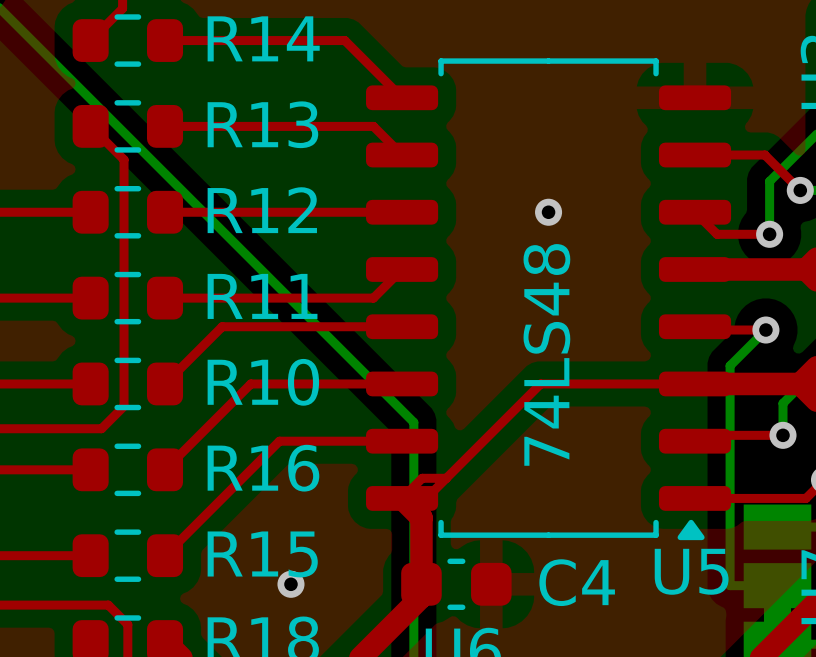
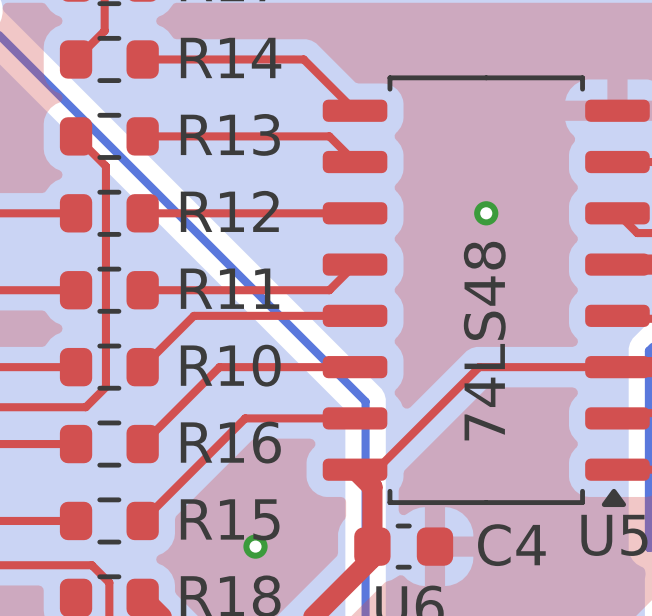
top track: (446, 478) (422, 478) (402, 498) -> none

